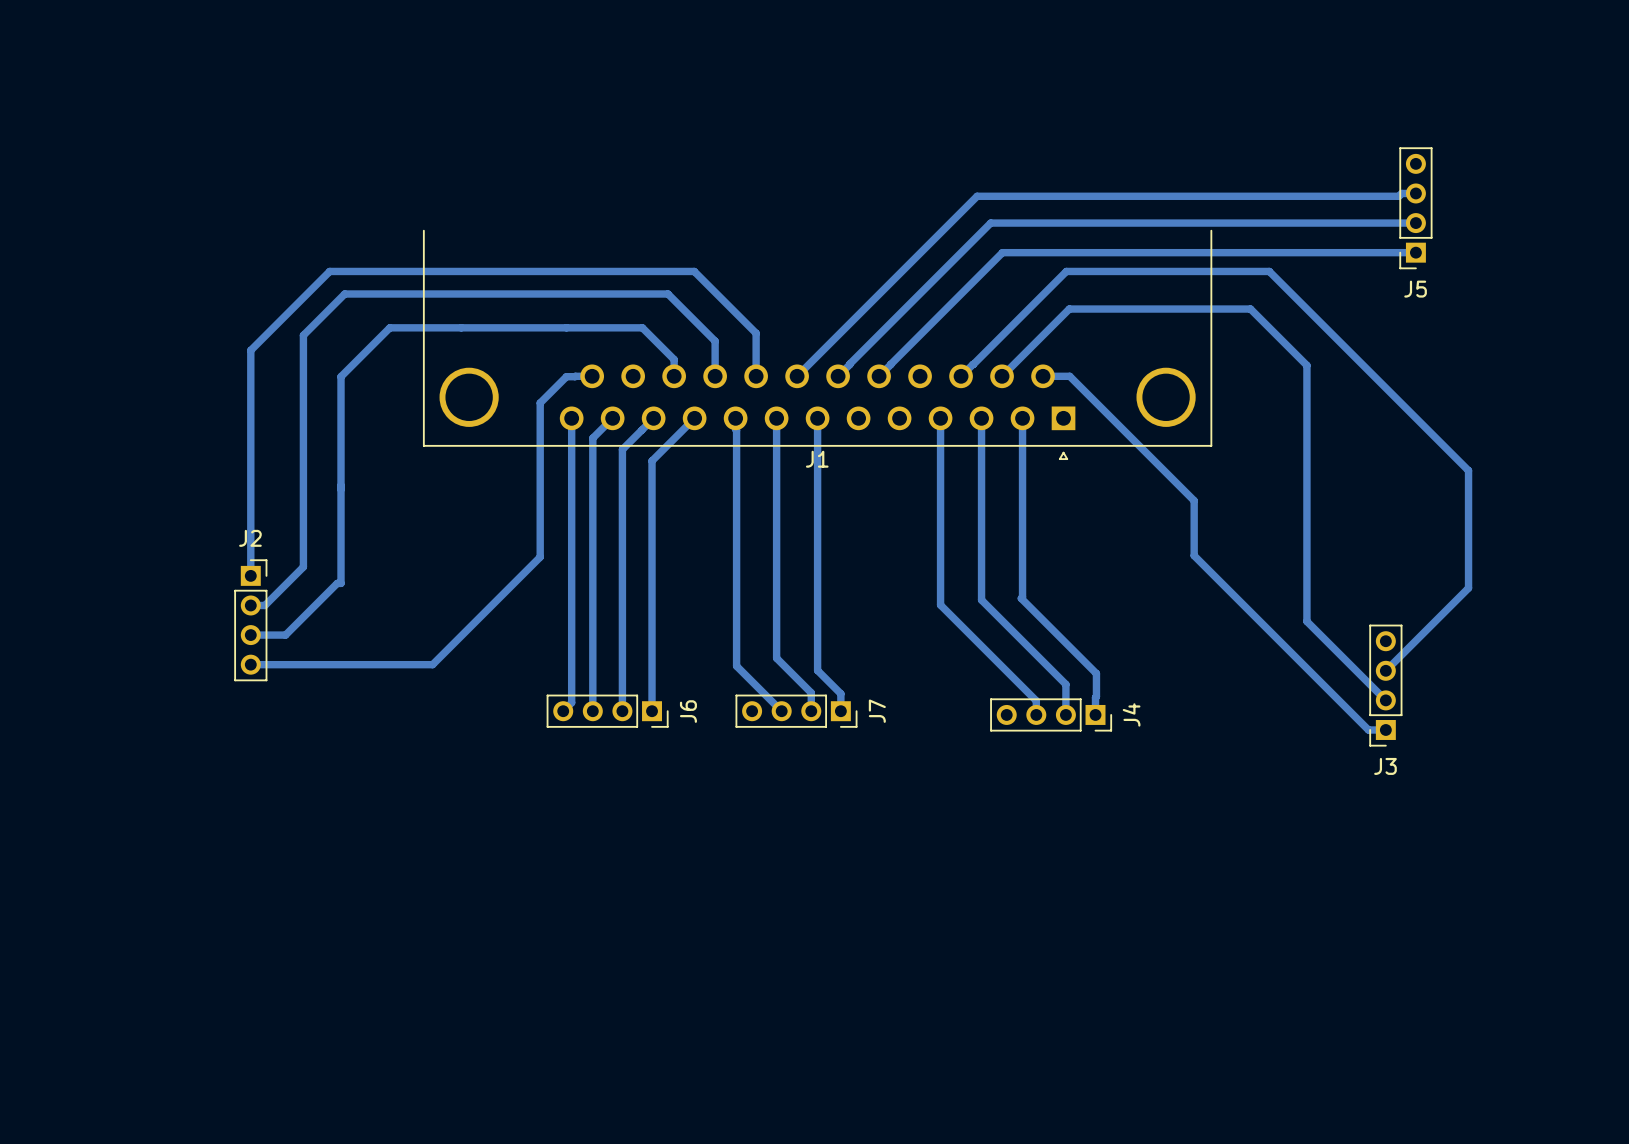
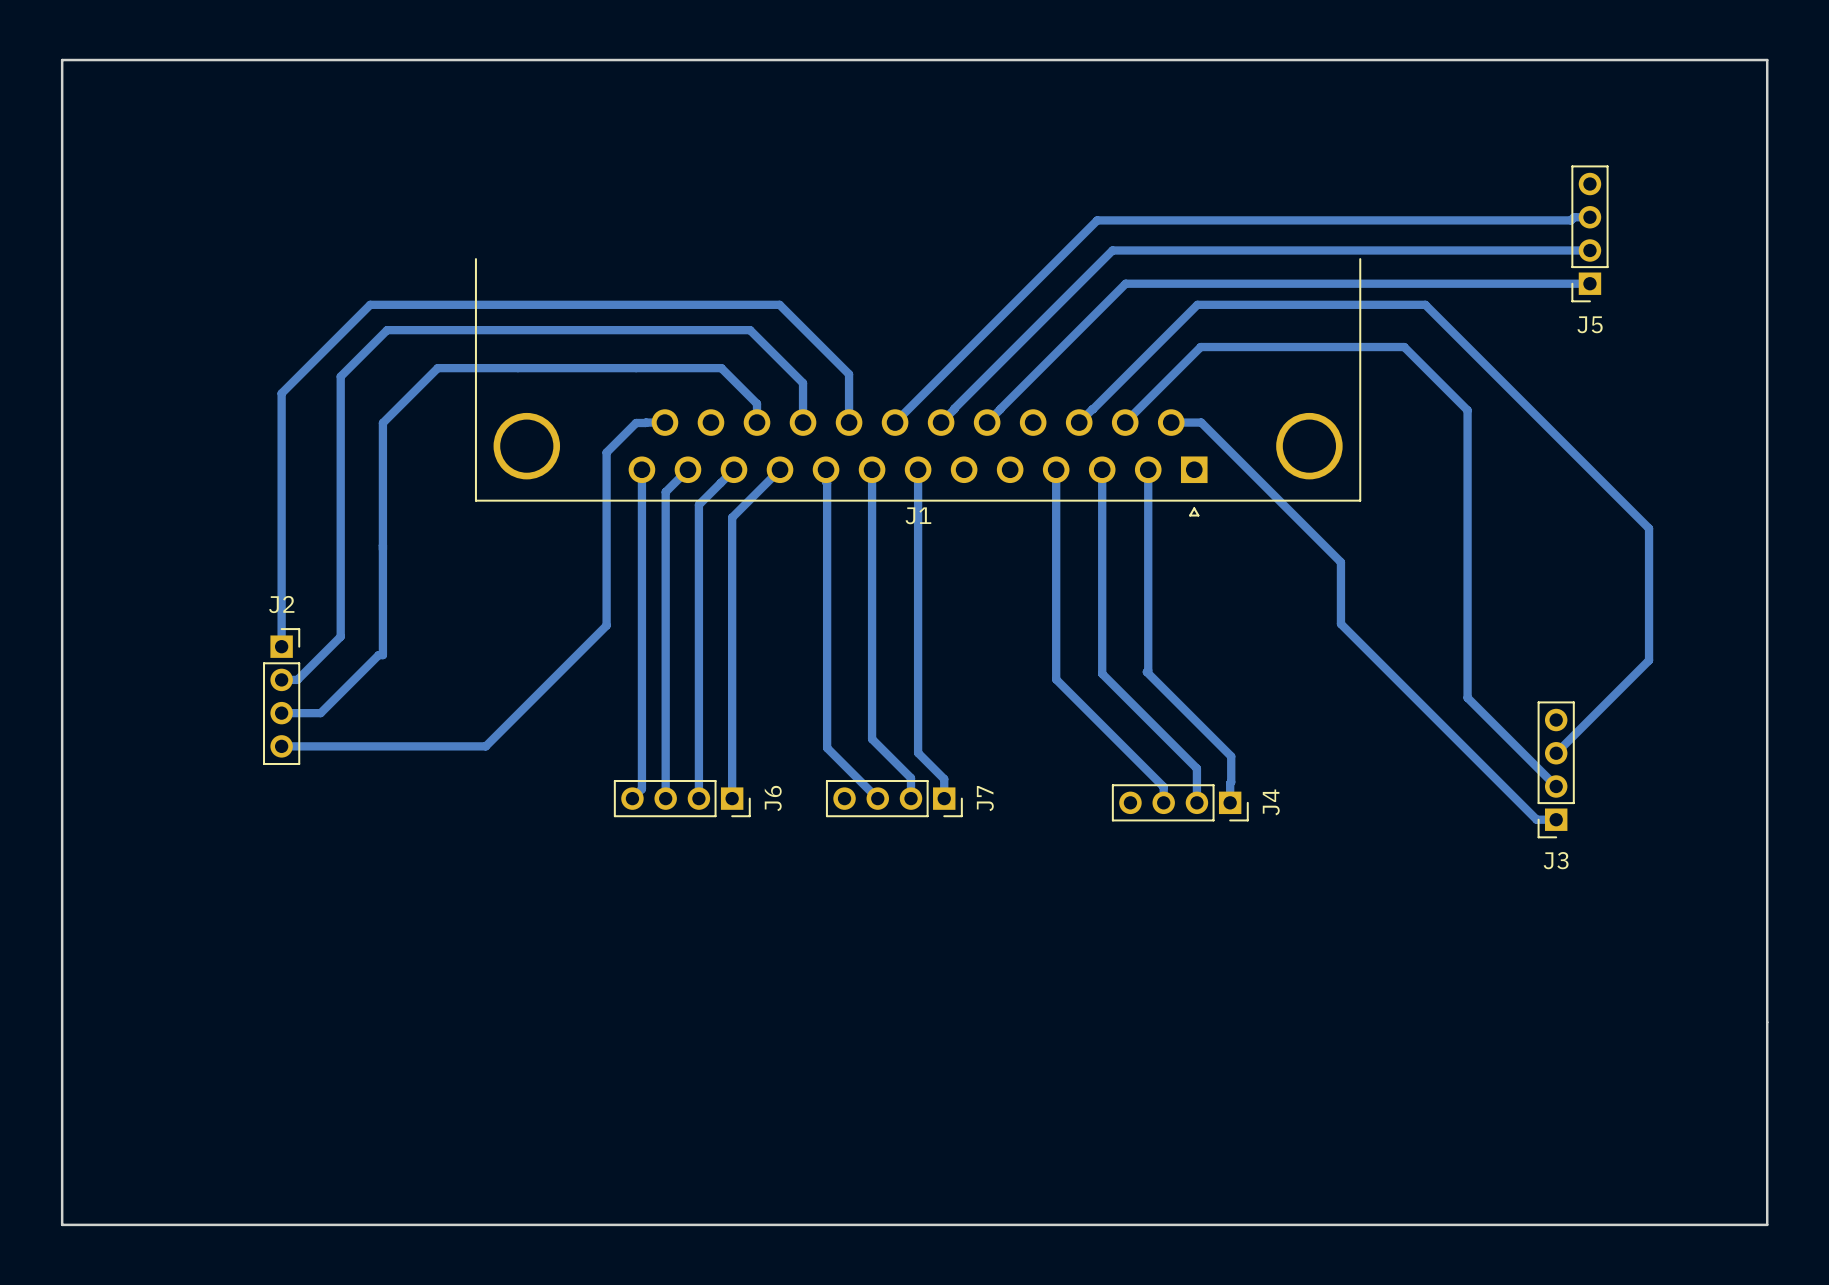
board edge: none -> (62, 60) (62, 1224) (1767, 1224) (1767, 60) (62, 60)

